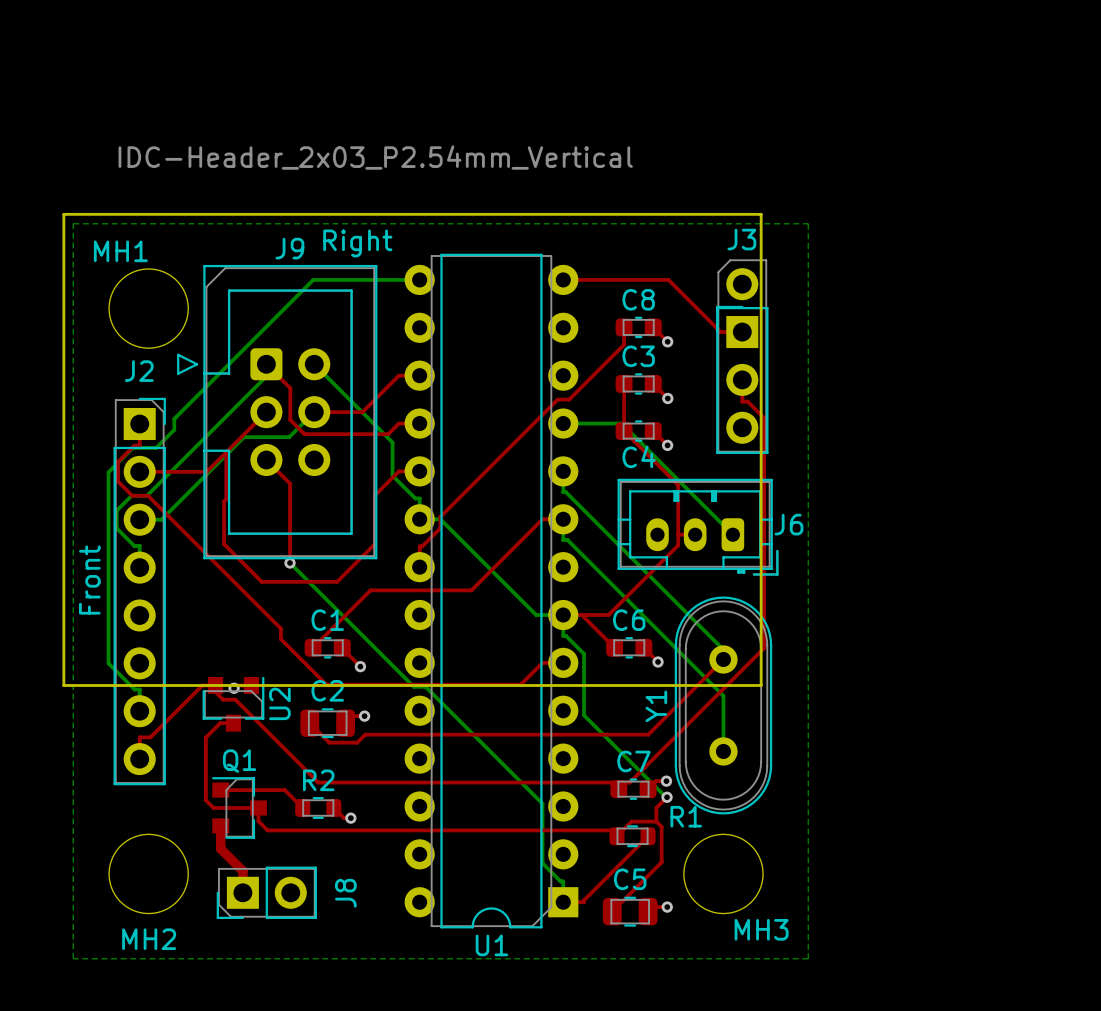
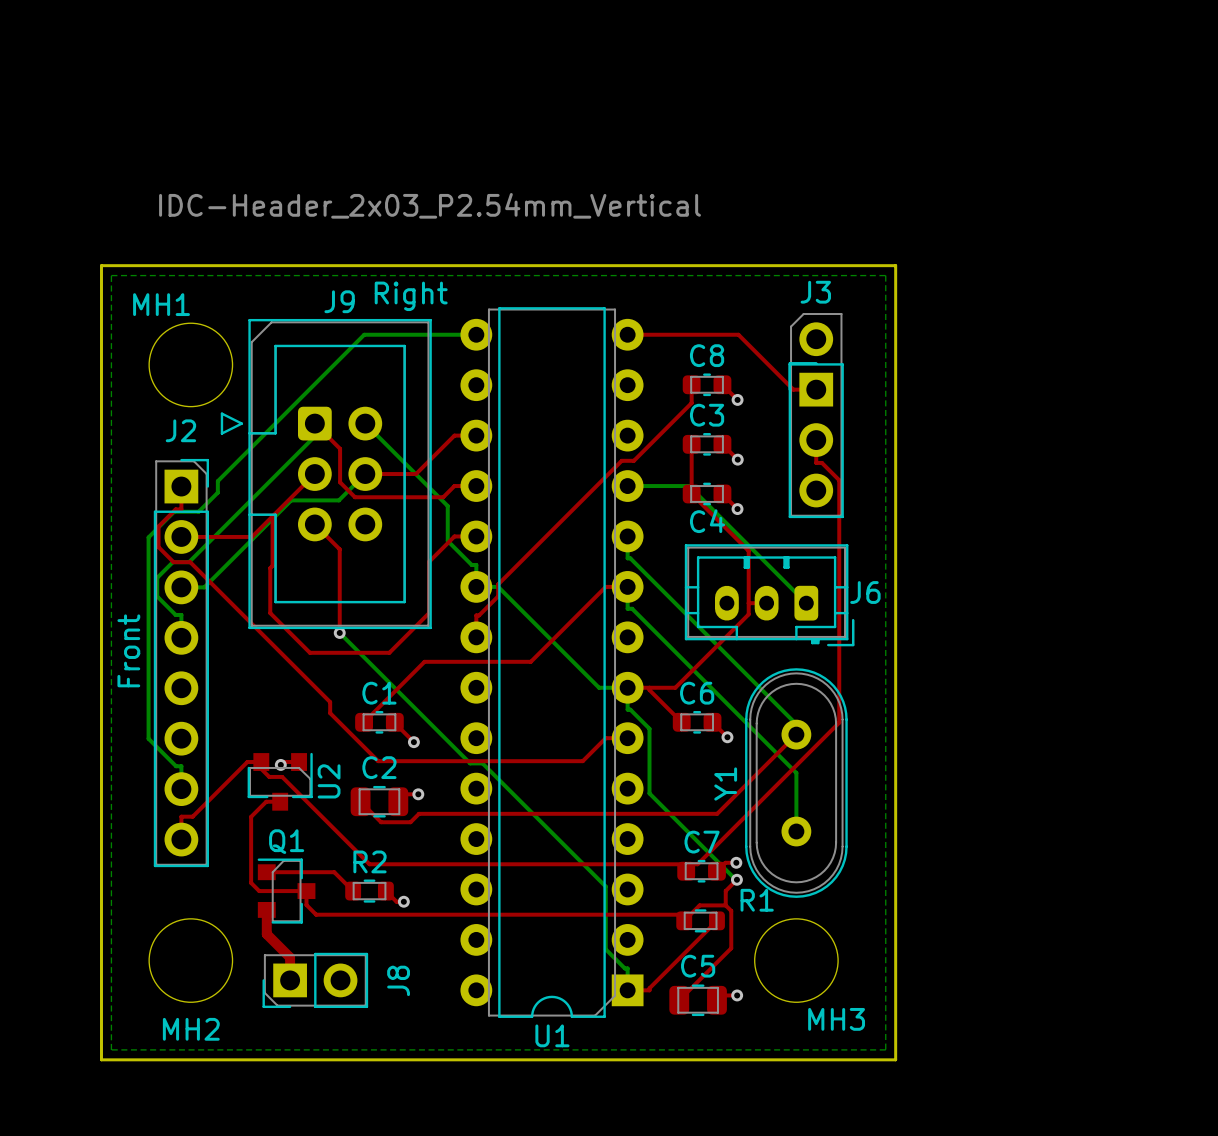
board edge: (761, 214) (761, 685) (63, 685) -> (836, 265) (895, 265) (895, 1059) (101, 1059) (101, 762)

